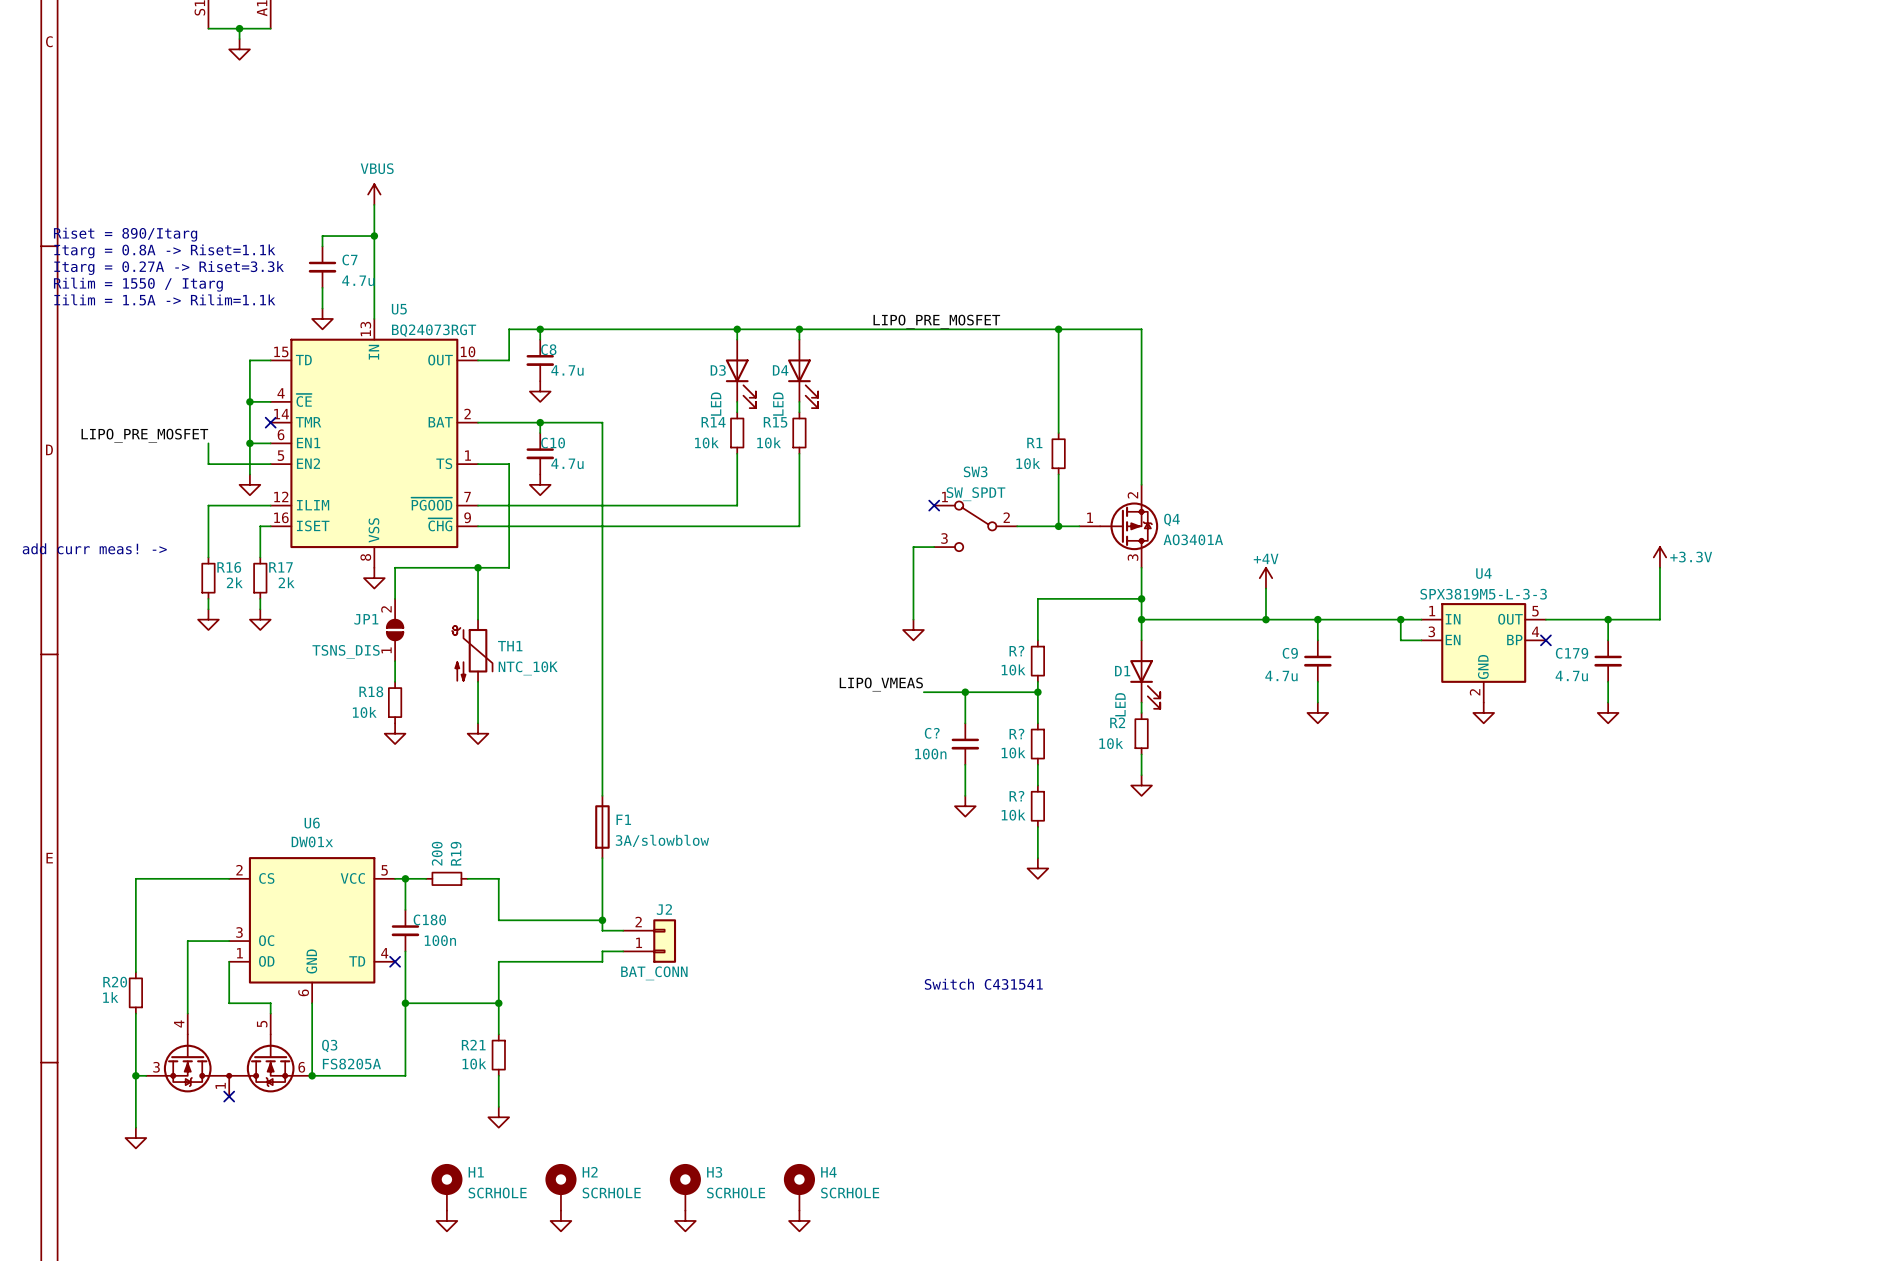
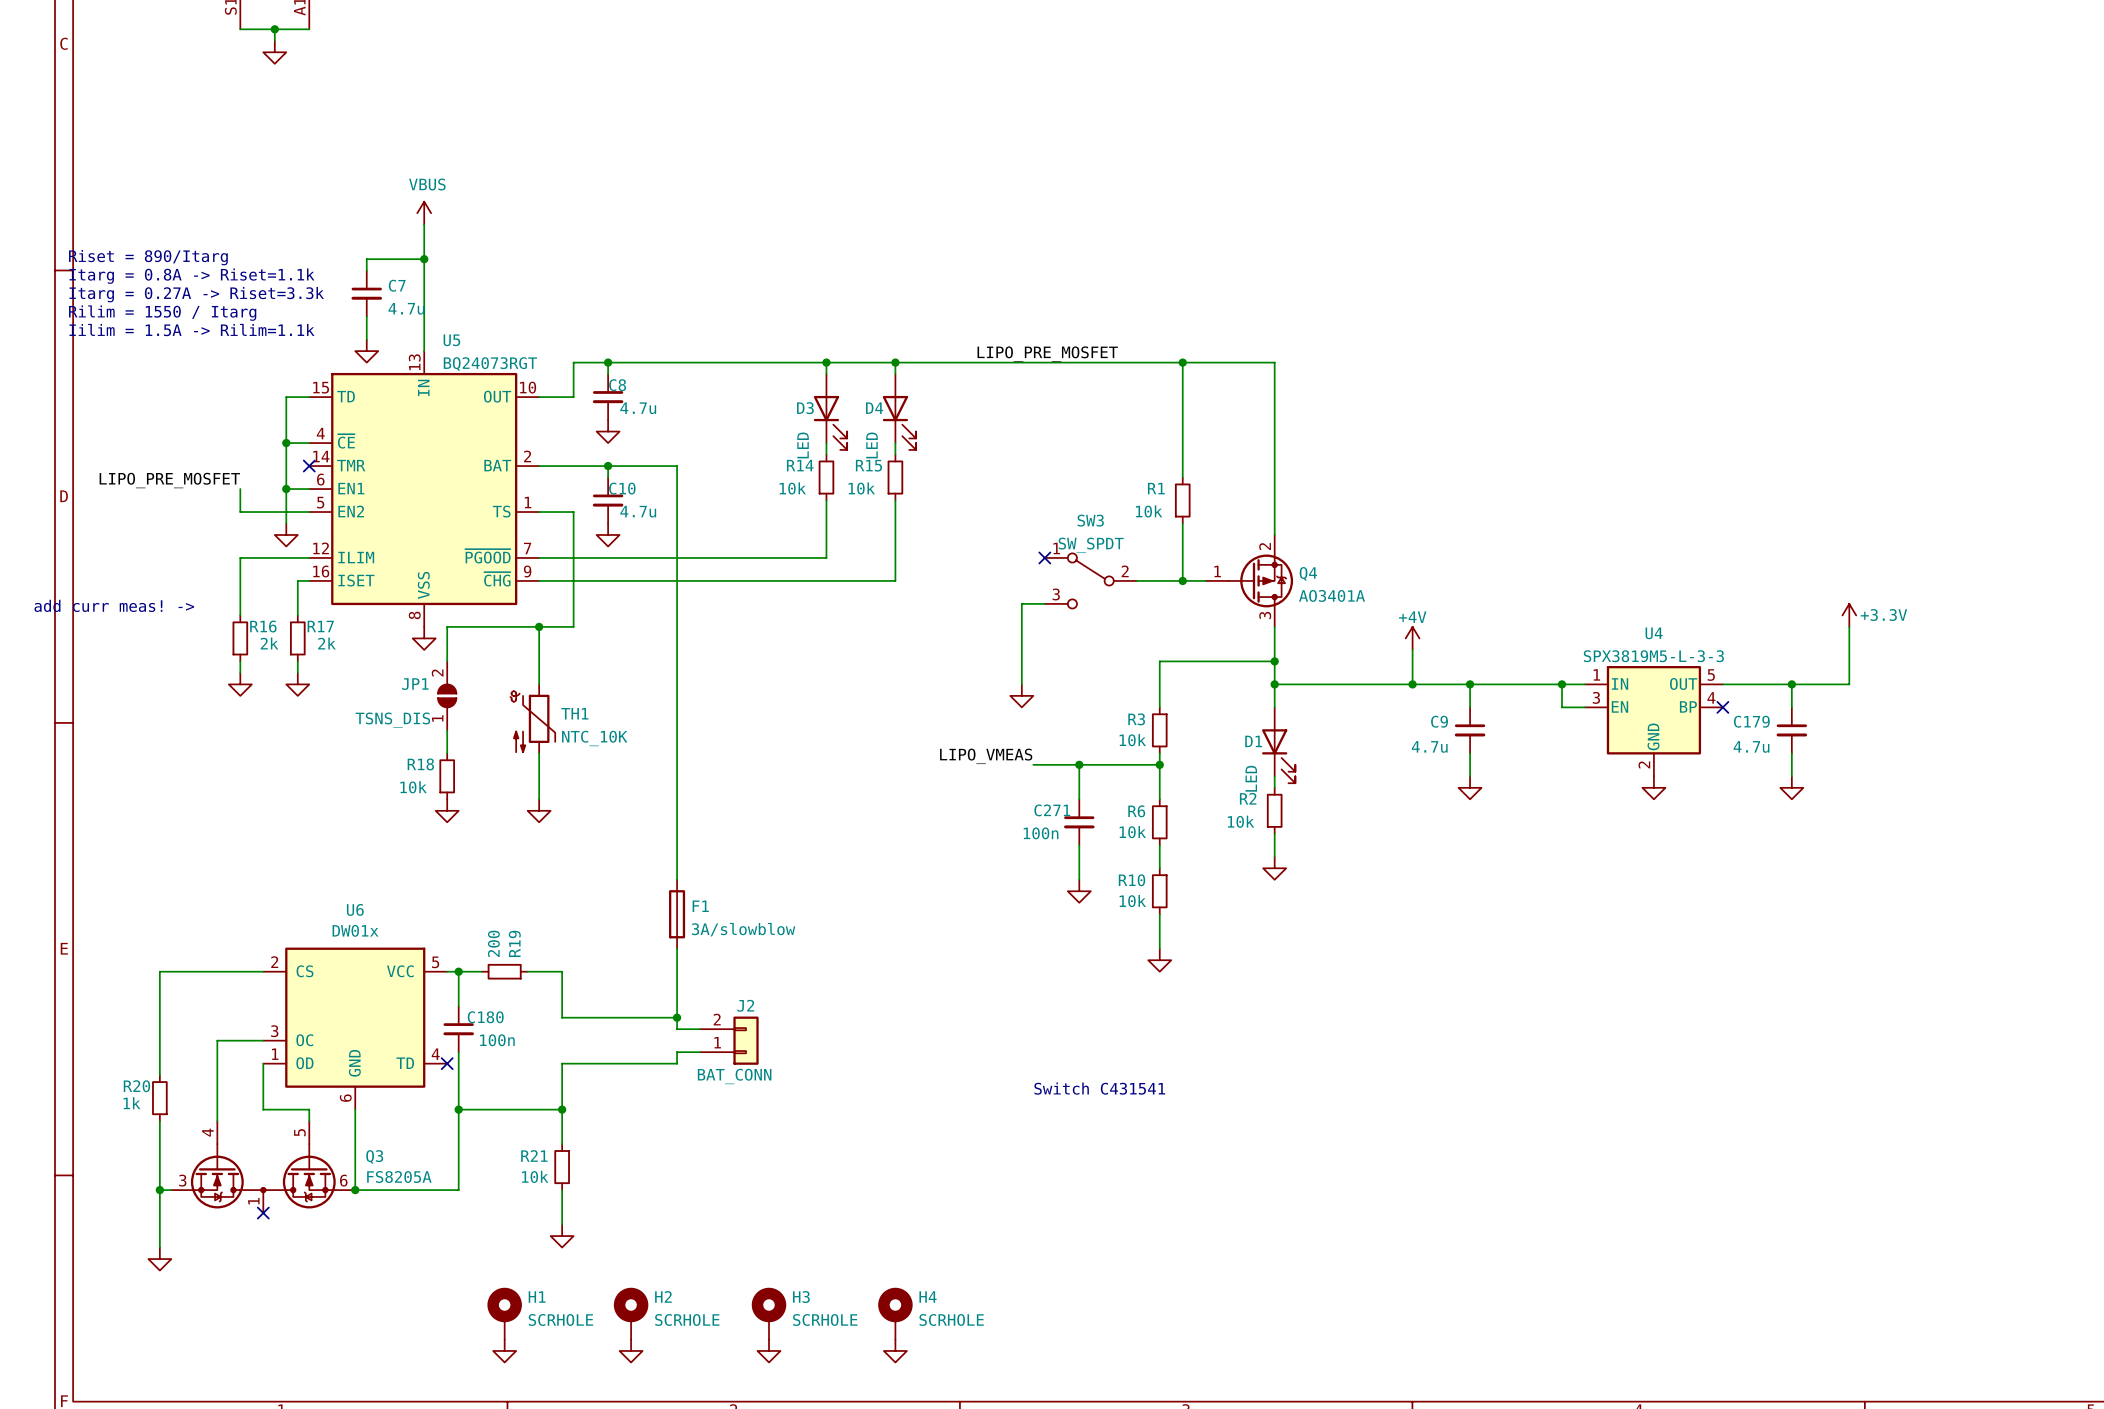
R? name: R? (1016, 651) -> R3 (1136, 719)
C? name: C? (932, 733) -> C271 (1052, 810)
R? name: R? (1016, 734) -> R6 (1136, 811)
R? name: R? (1016, 796) -> R10 (1131, 880)

